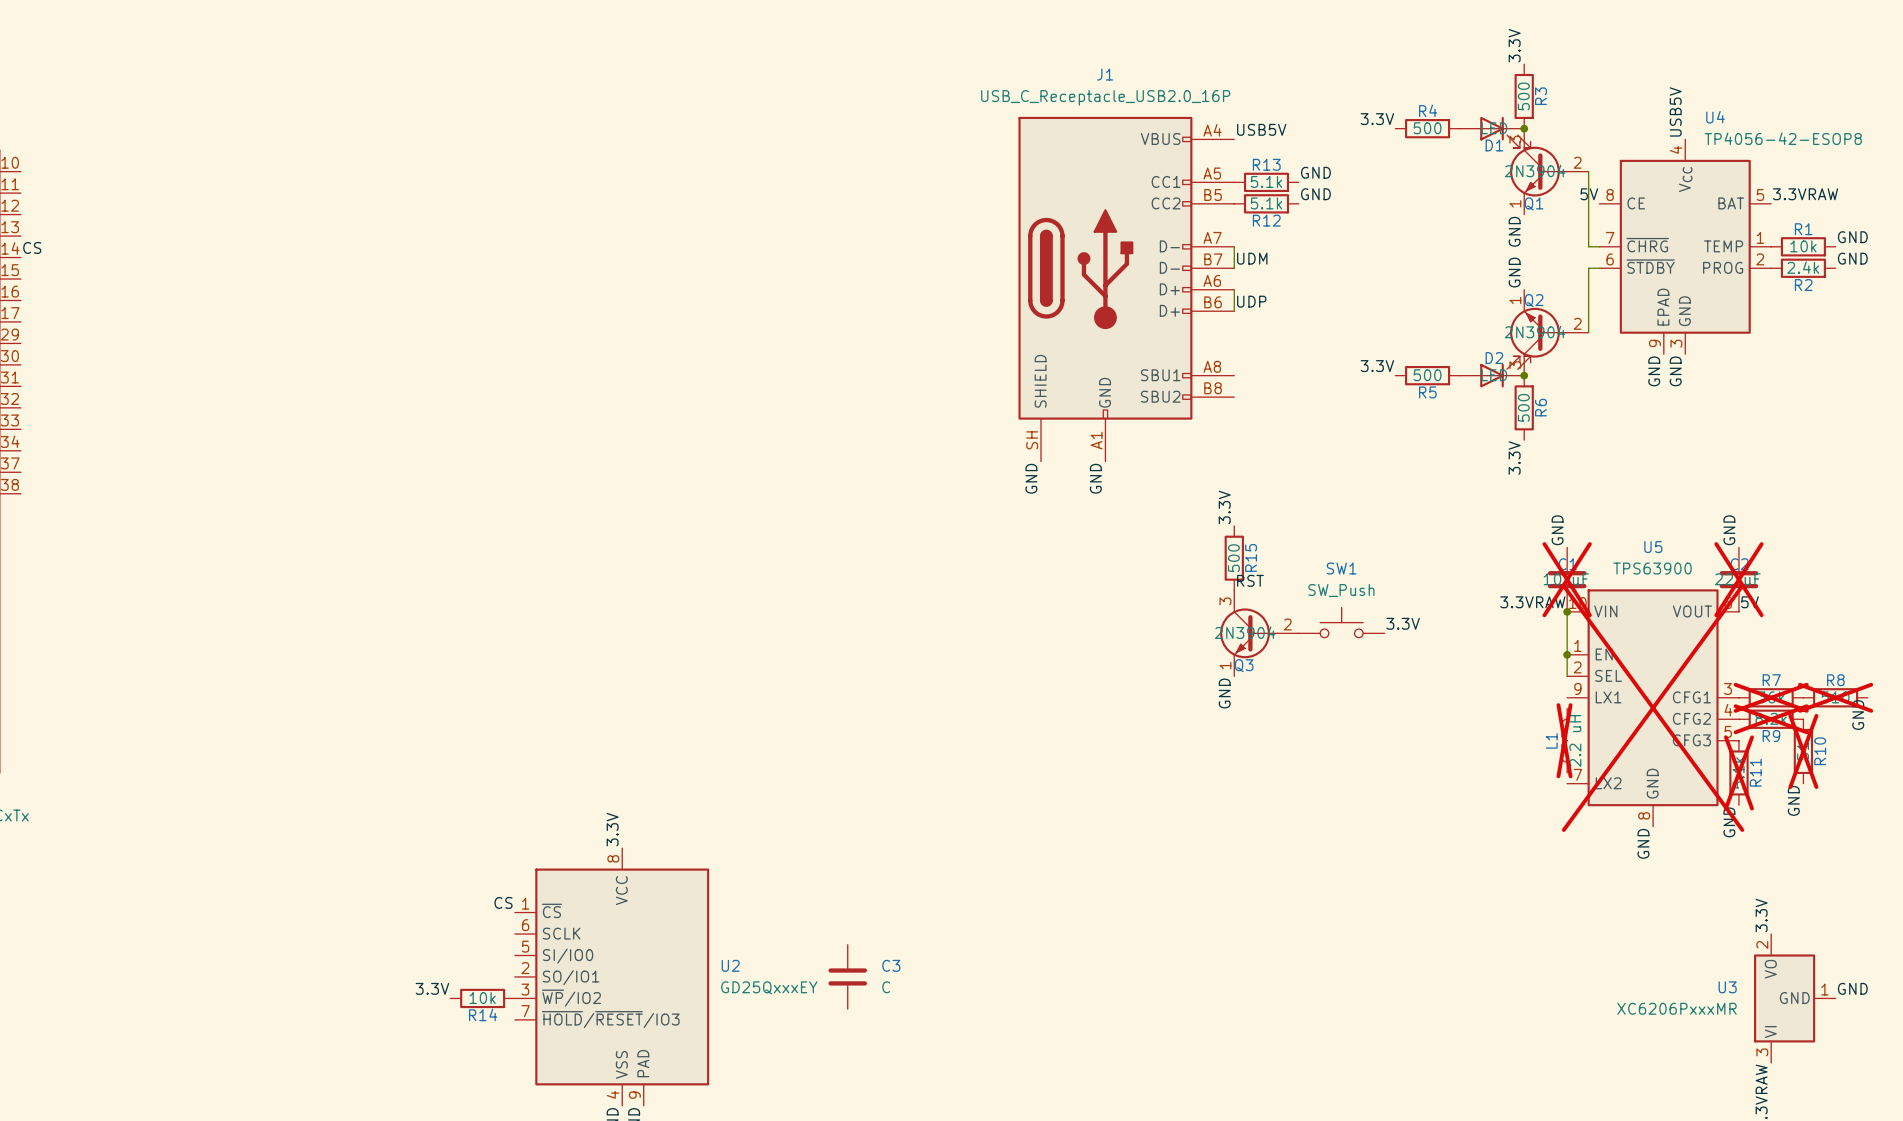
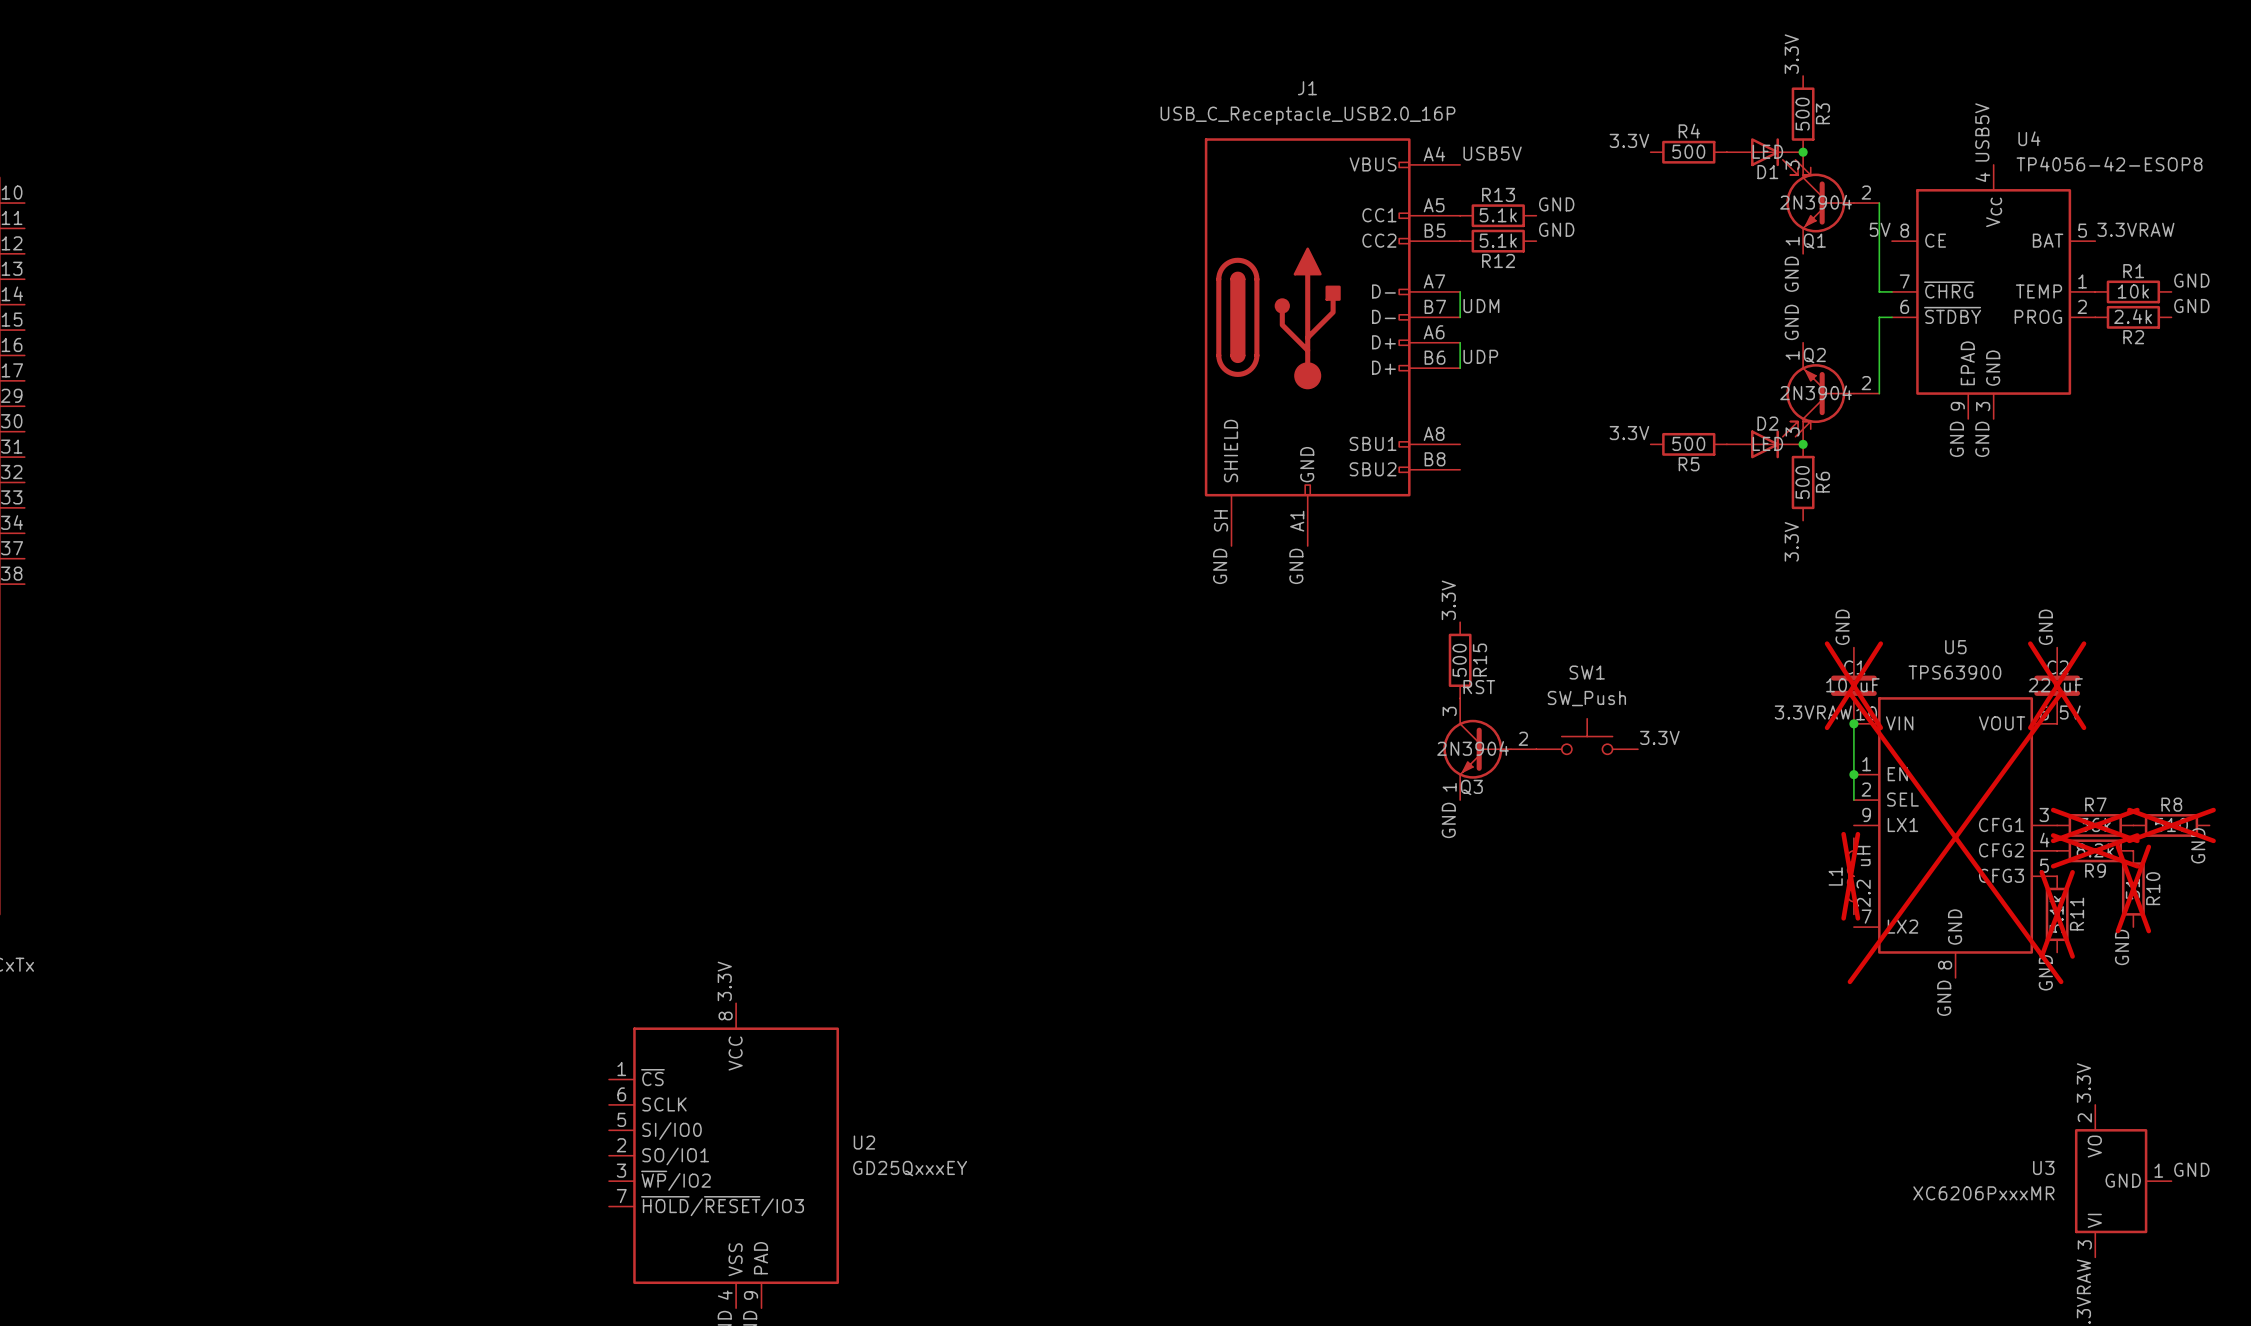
label: CS (32, 247) -> none
label: CS (503, 902) -> none
C3: C (847, 976) -> none
label: 3.3V (432, 988) -> none
R14: 10k (482, 998) -> none

